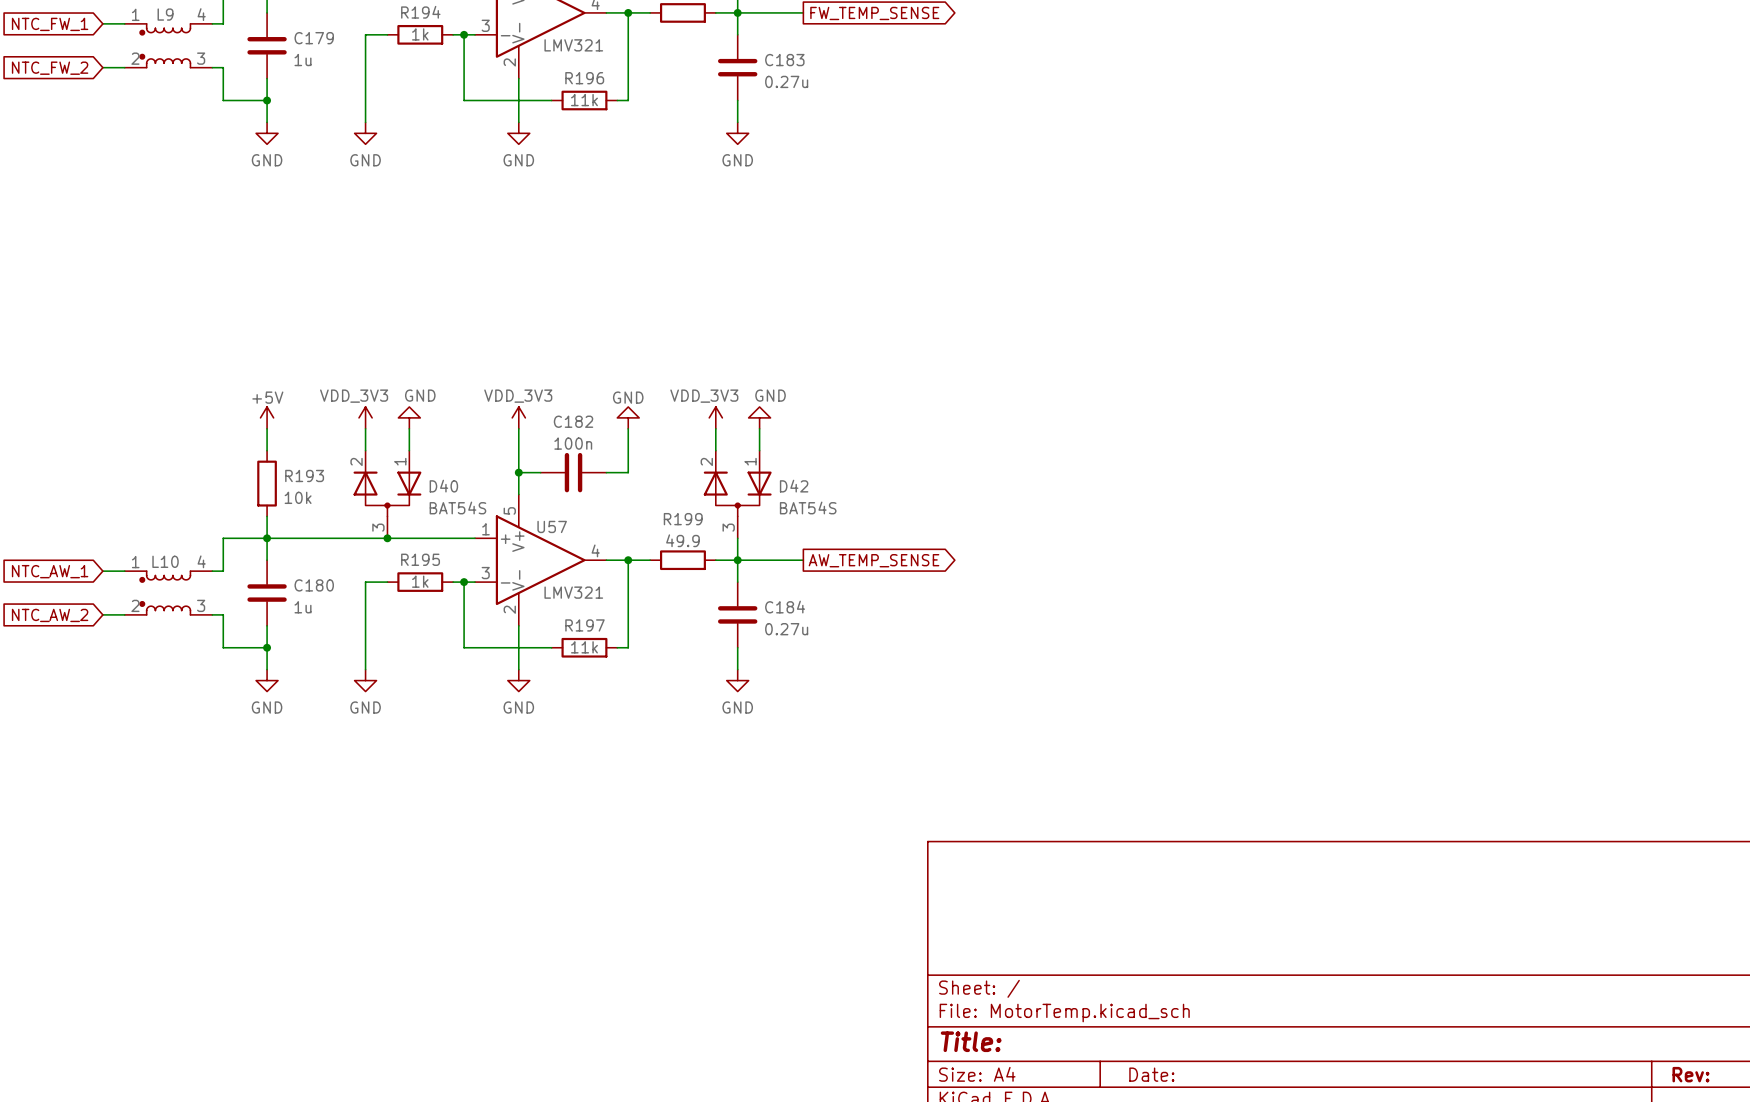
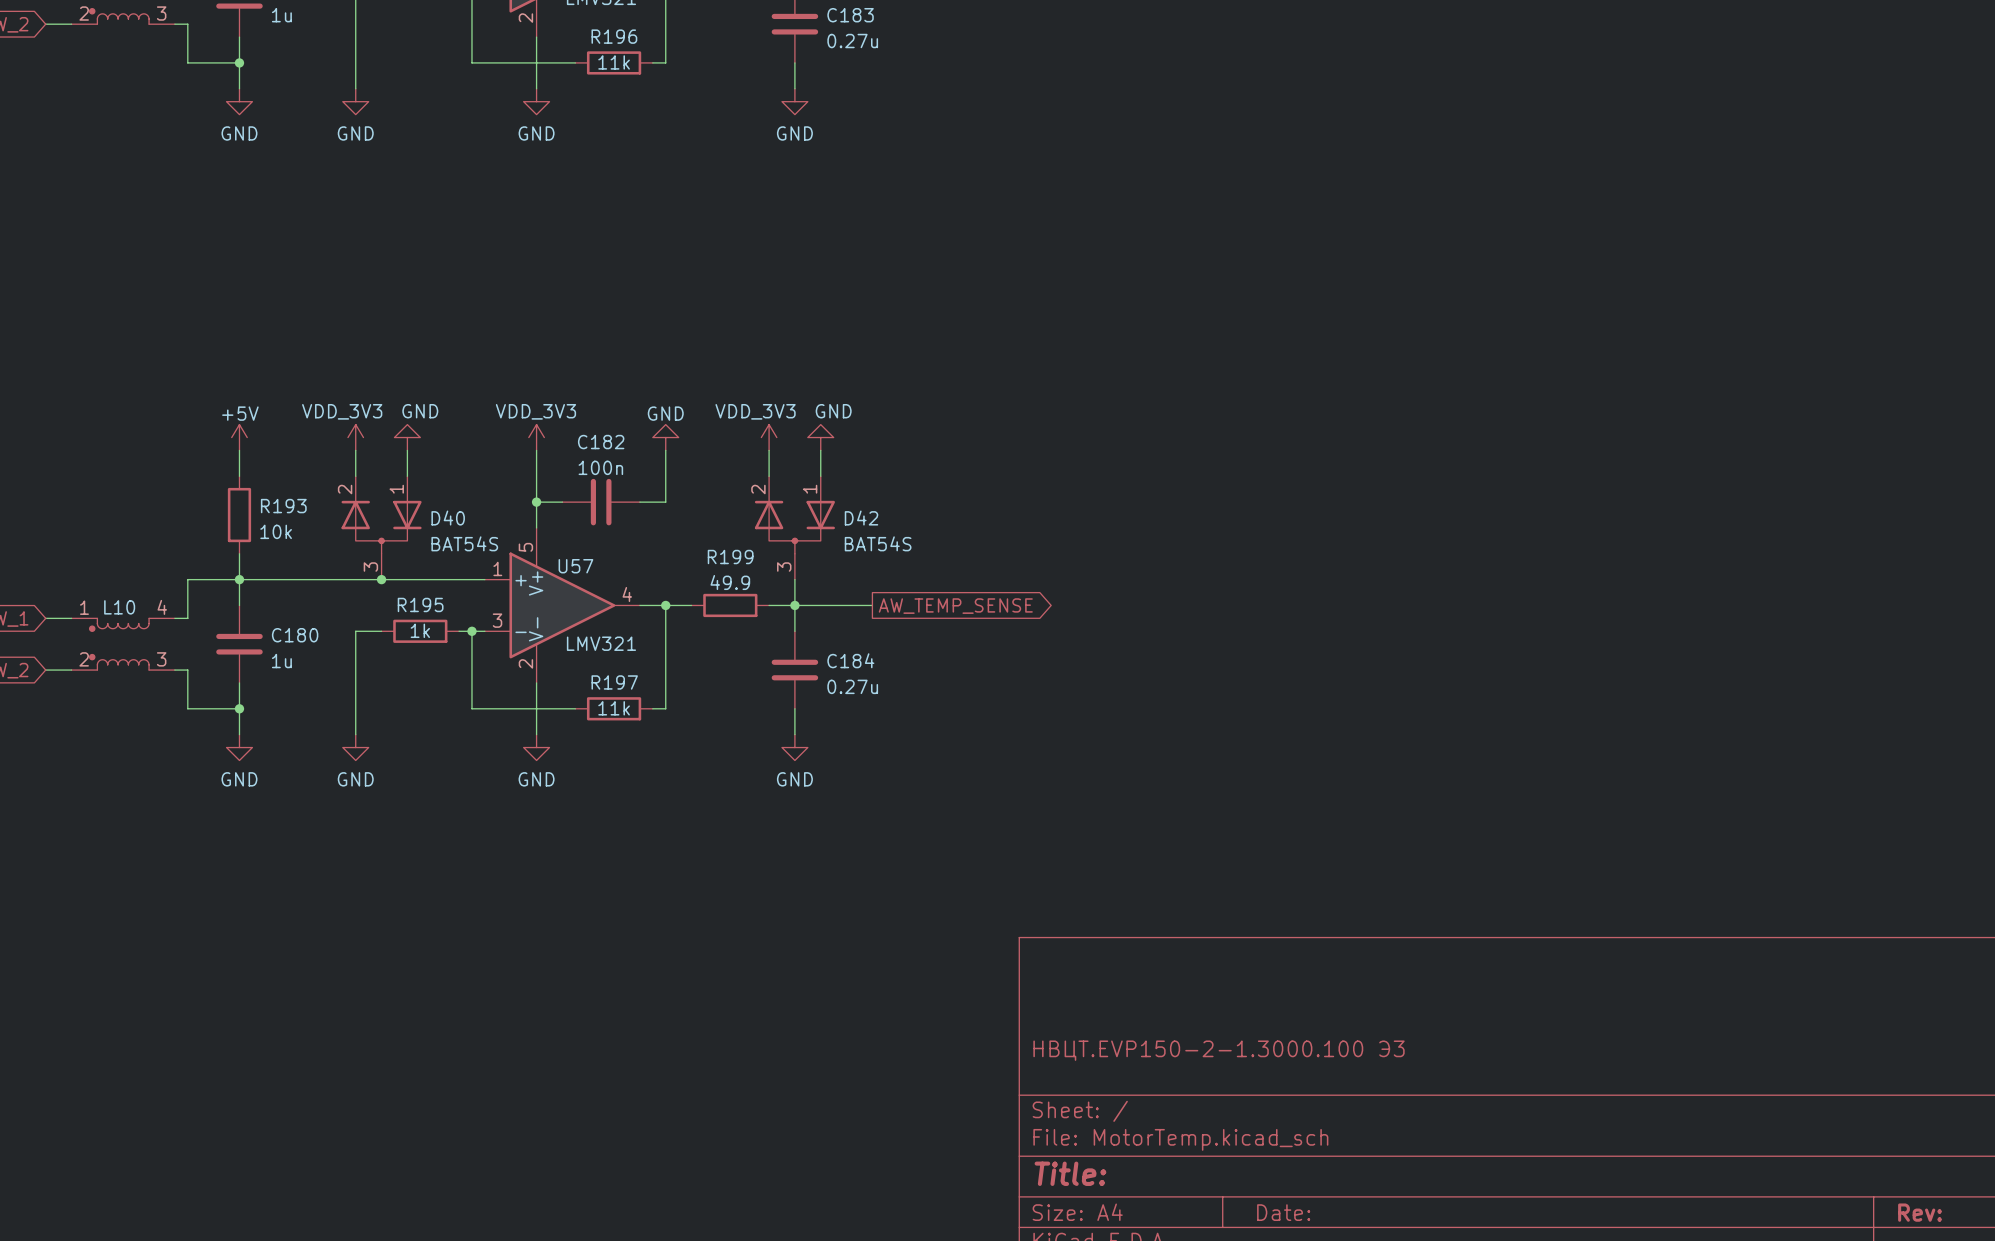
title block: none -> НВЦТ.EVP150-2-1.3000.100 Э3 (1219, 1050)

